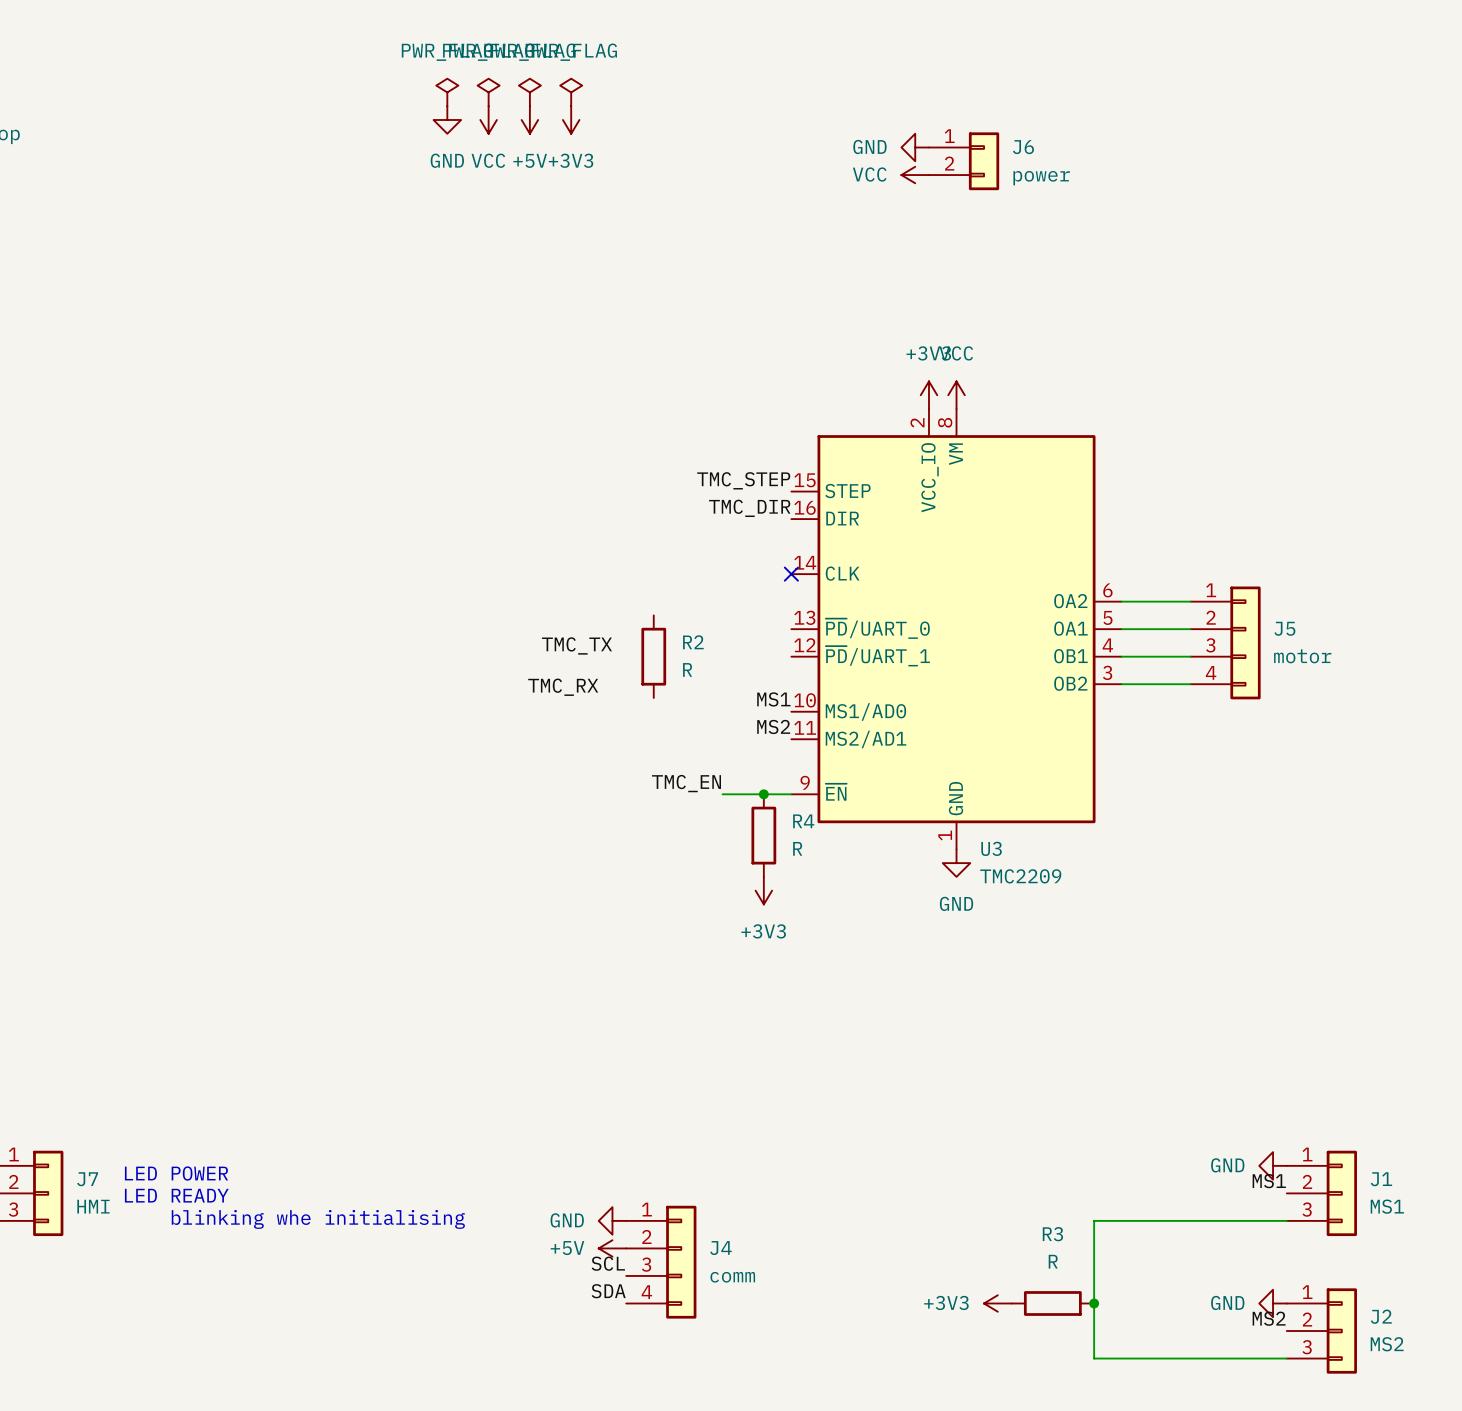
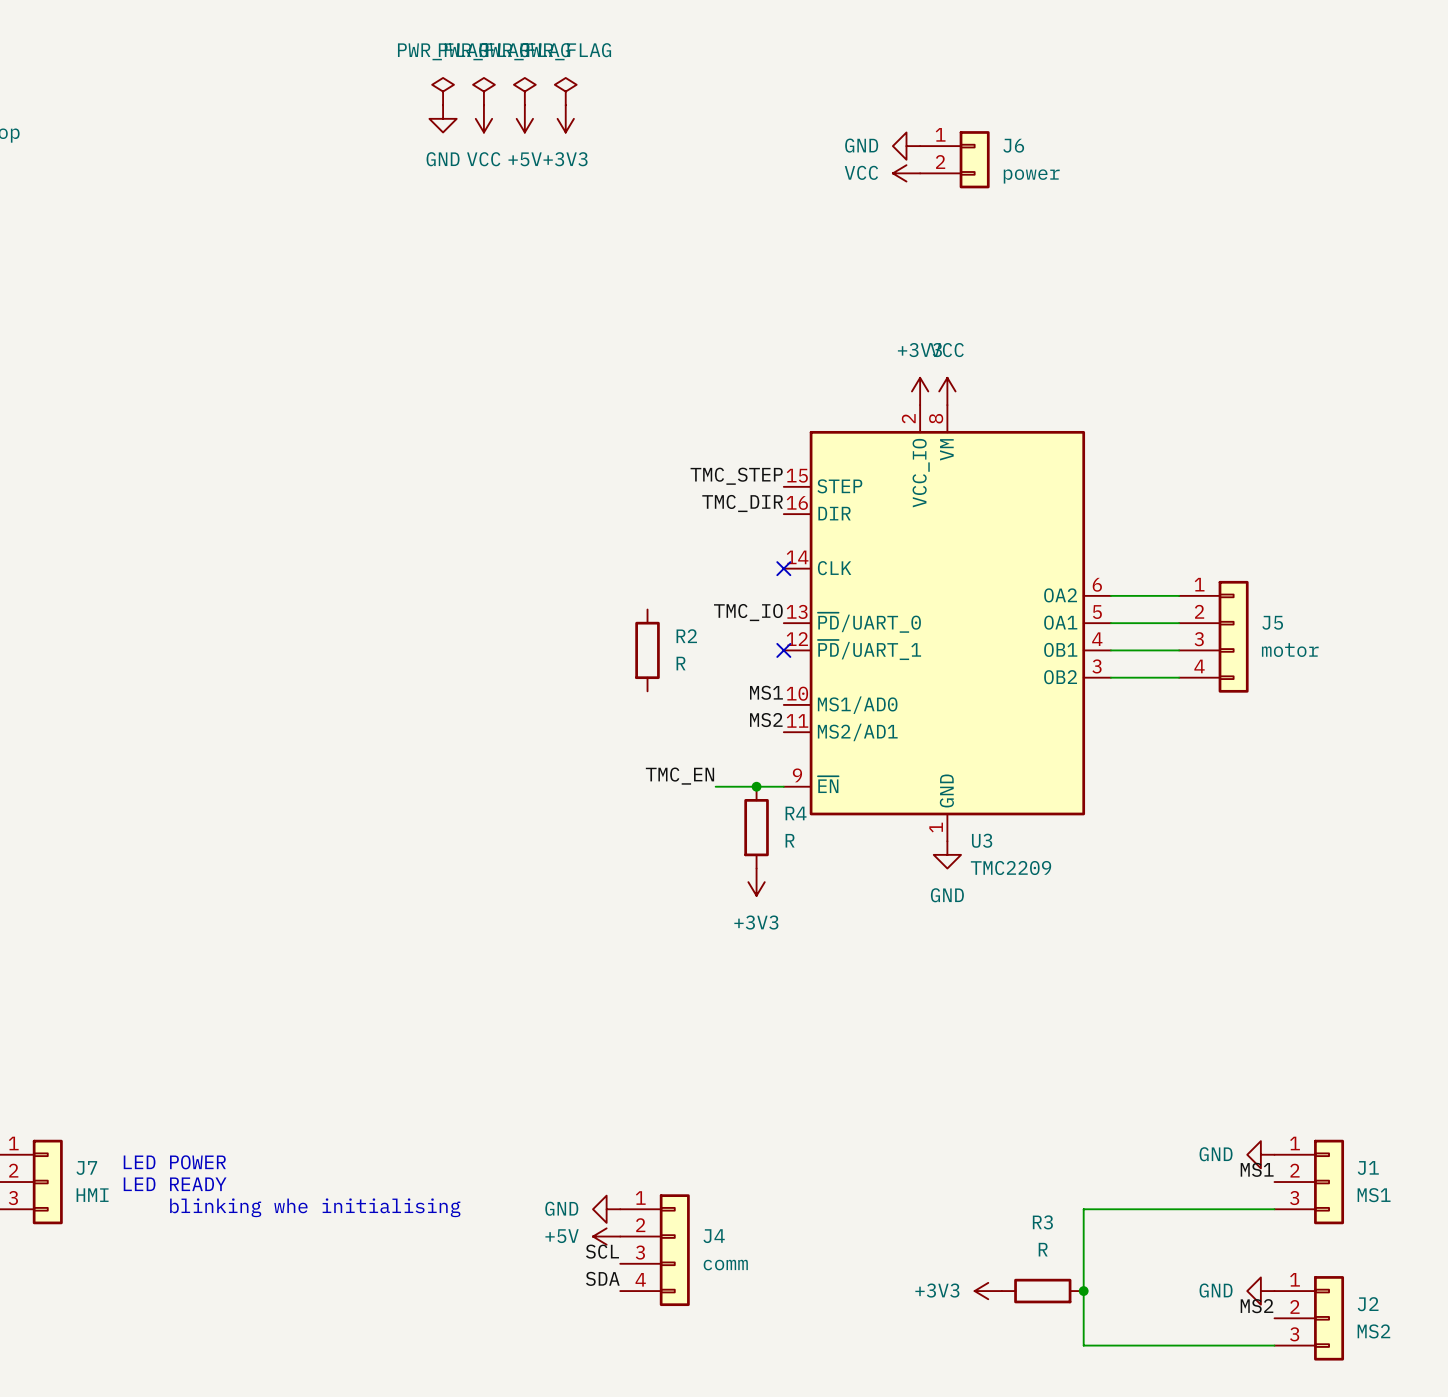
label: none -> TMC_IO (748, 612)
label: TMC_TX (576, 645) -> none
no-connect mark: none -> (783, 650)
label: TMC_RX (563, 687) -> none

